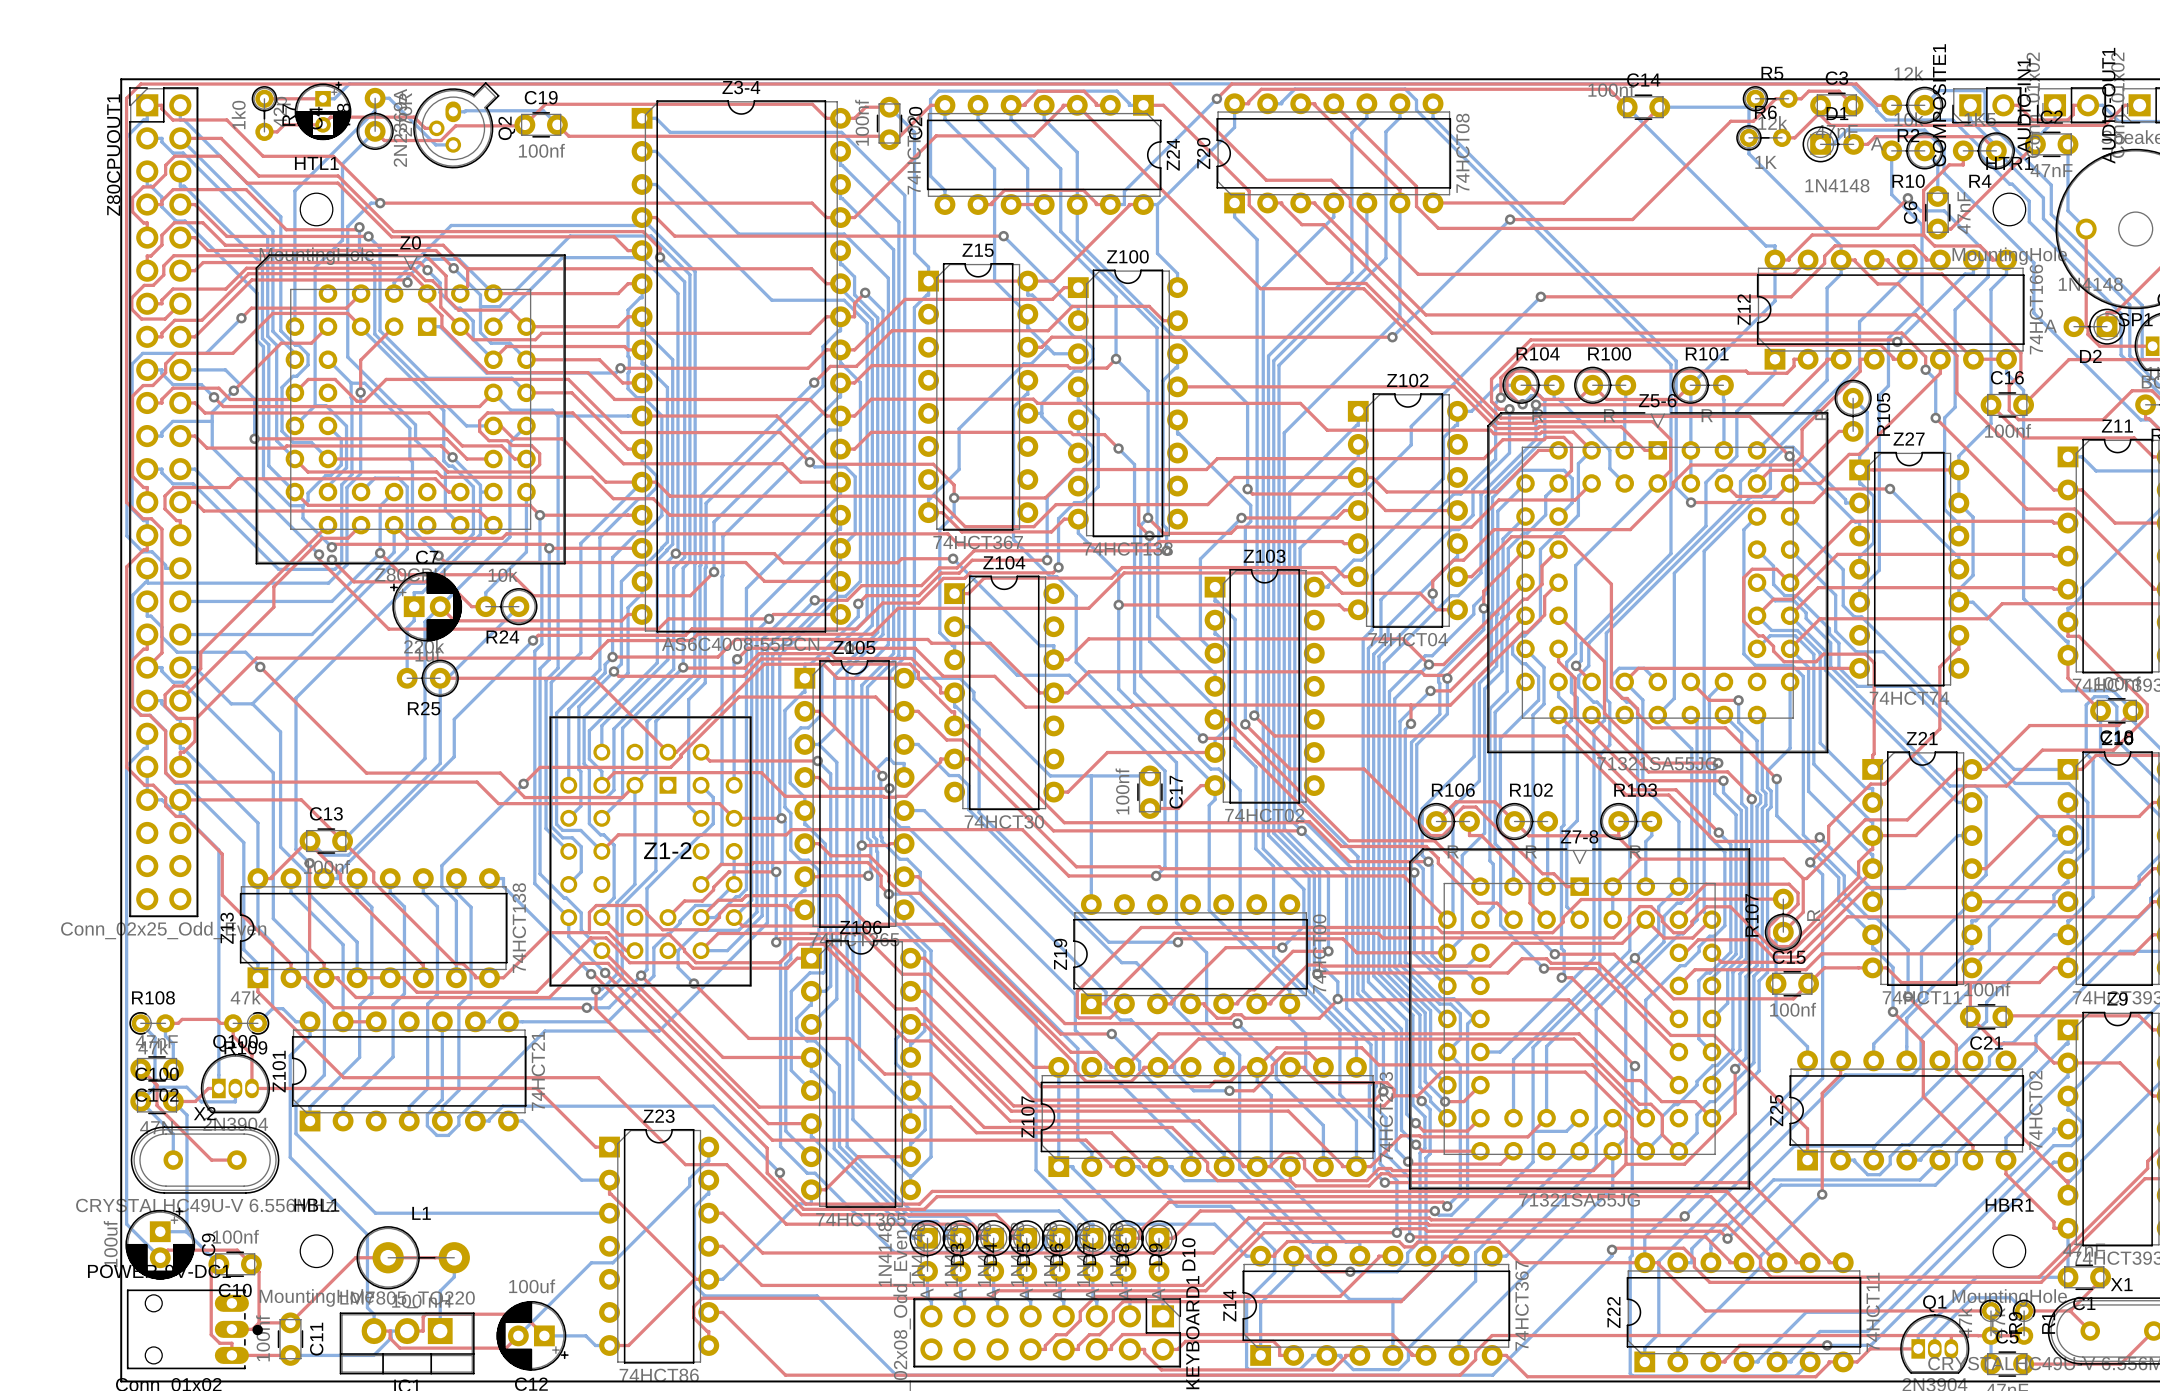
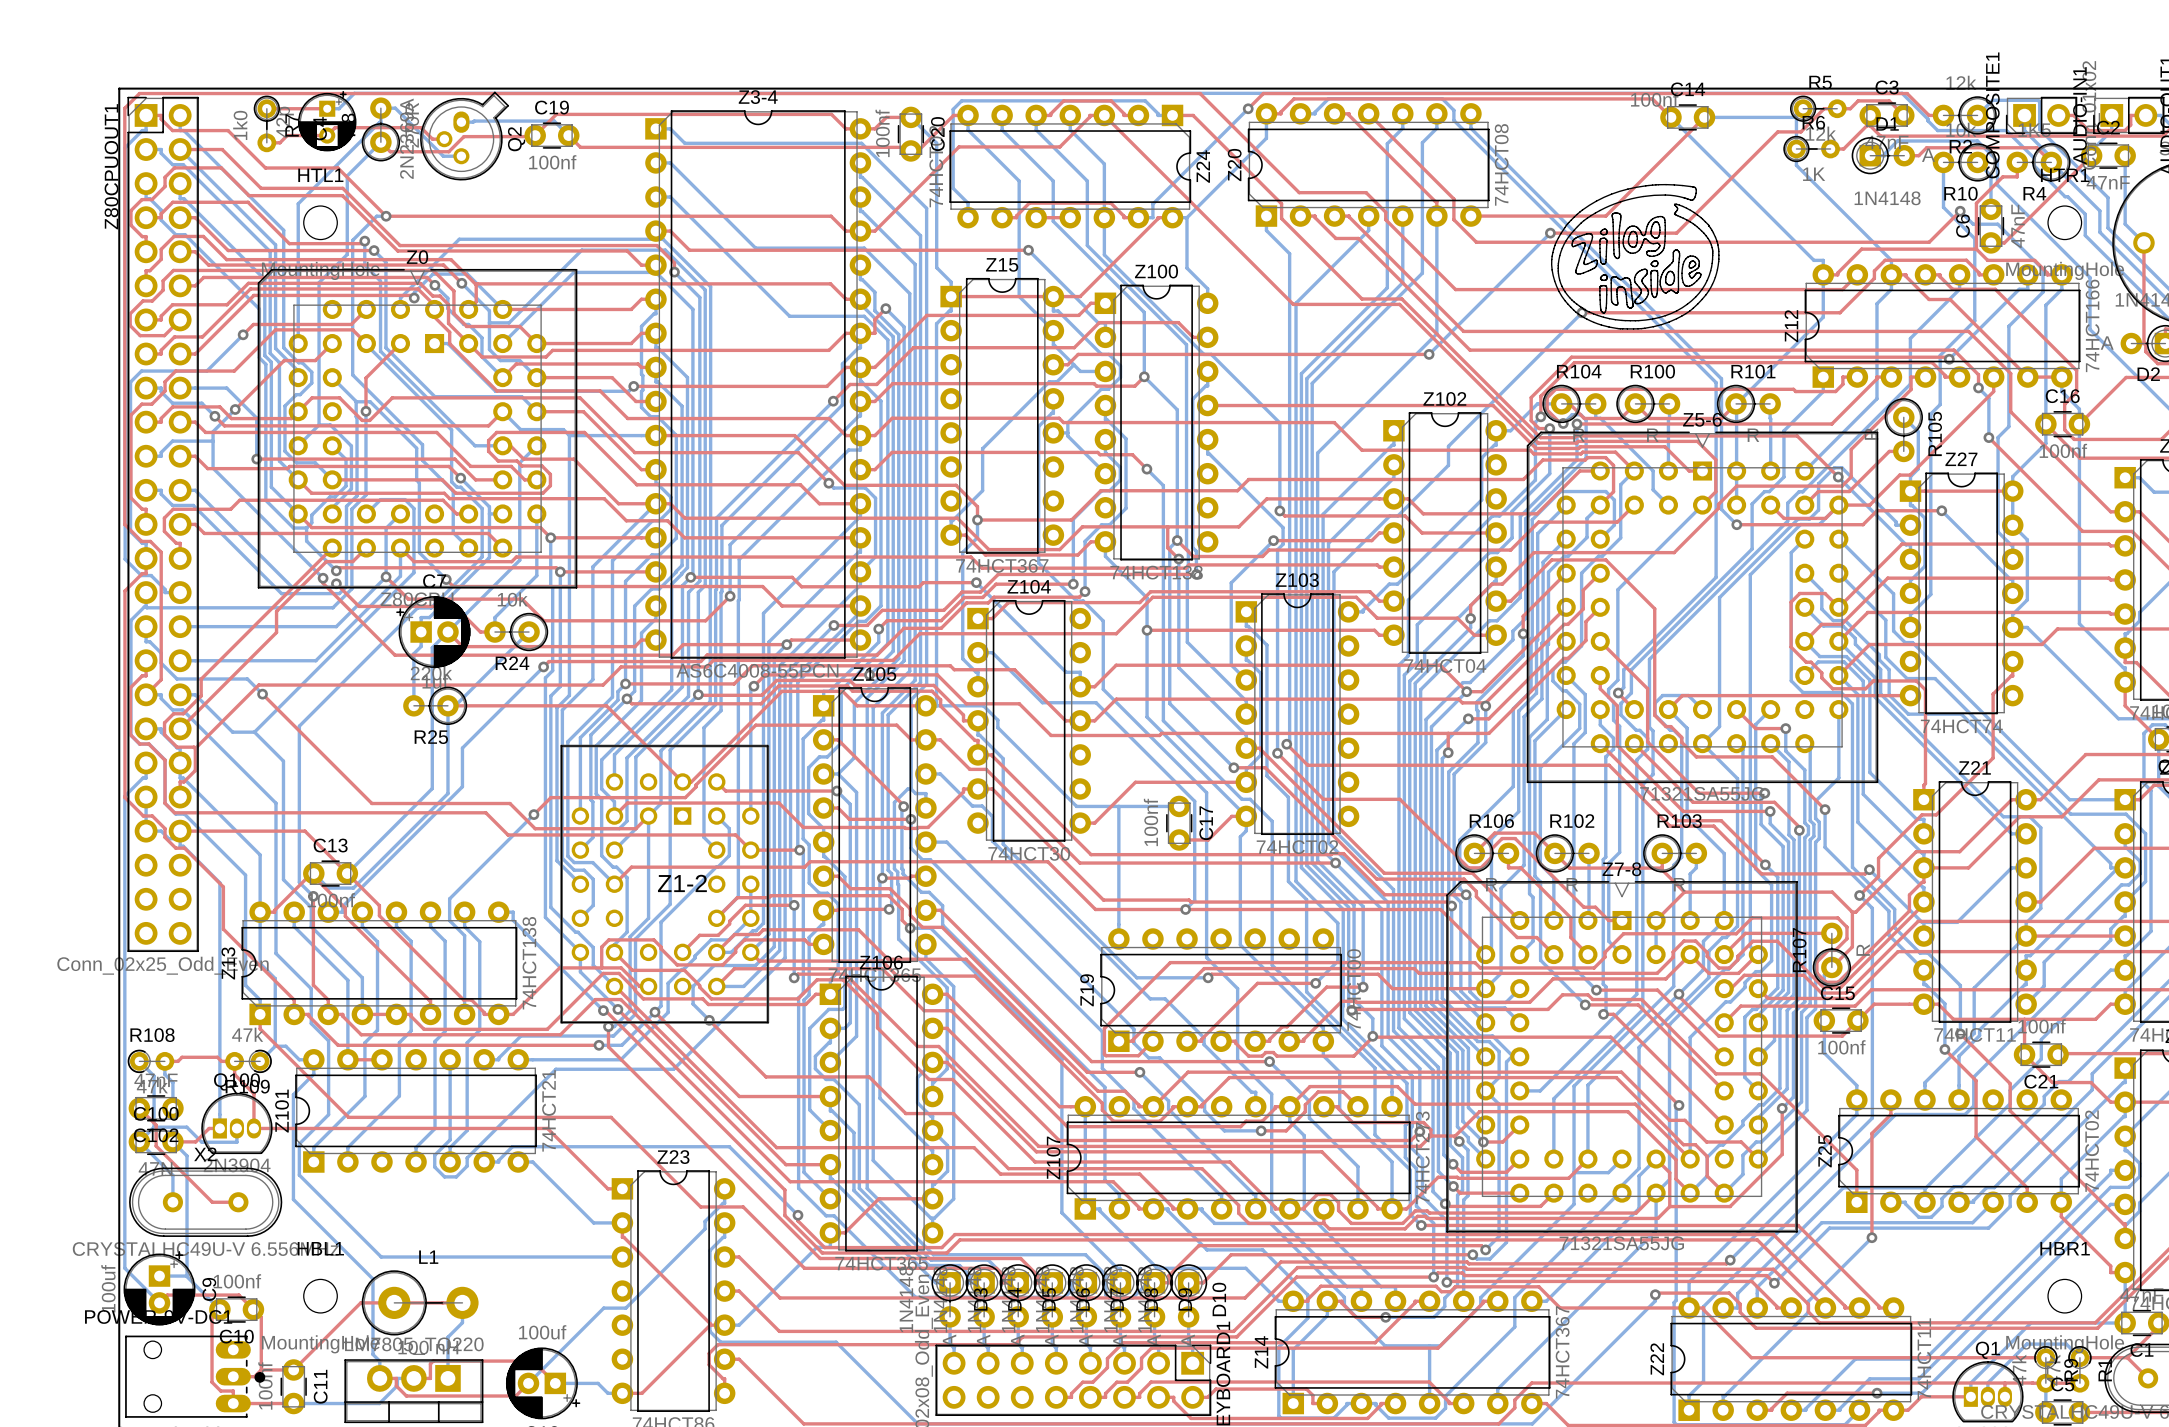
line: none -> (1658, 184) (1627, 189) (1596, 201) (1574, 217) (1558, 237) (1551, 259) (1554, 280) (1565, 300) (1574, 311) (1587, 319) (1601, 325) (1619, 328) (1641, 328) (1661, 324) (1689, 310) (1710, 287) (1718, 261) (1718, 249) (1715, 237) (1708, 224) (1700, 217) (1686, 208) (1675, 204) (1677, 208) (1674, 214) (1690, 221) (1701, 230) (1709, 241) (1712, 250) (1711, 267) (1707, 280) (1699, 293) (1687, 304) (1671, 313) (1652, 318) (1615, 319) (1584, 309) (1569, 297) (1561, 286) (1558, 268) (1562, 248) (1570, 234) (1587, 218) (1610, 205) (1637, 197) (1670, 195) (1691, 200) (1695, 195) (1694, 187) (1658, 184)
line: none -> (1614, 213) (1620, 215) (1619, 255) (1617, 258) (1614, 253) (1612, 215) (1614, 213)
line: none -> (1660, 216) (1664, 218) (1665, 225) (1664, 245) (1661, 252) (1653, 256) (1647, 254) (1647, 251) (1655, 250) (1659, 245) (1658, 243) (1651, 243) (1645, 238) (1637, 251) (1631, 253) (1626, 250) (1623, 241) (1627, 228) (1635, 226) (1644, 235) (1649, 221) (1660, 216)
line: none -> (1656, 221) (1659, 230) (1658, 236) (1655, 238) (1652, 236) (1650, 232) (1653, 224) (1656, 221)
line: none -> (1604, 229) (1606, 233) (1602, 234) (1600, 231) (1604, 229)
line: none -> (1633, 231) (1630, 233) (1628, 241) (1633, 247) (1636, 245) (1637, 239) (1636, 233) (1633, 231)
line: none -> (1589, 233) (1592, 237) (1584, 263) (1596, 260) (1597, 263) (1592, 269) (1577, 273) (1575, 270) (1585, 243) (1573, 246) (1572, 241) (1576, 237) (1589, 233)
line: none -> (1603, 238) (1599, 241) (1600, 260) (1603, 264) (1605, 261) (1606, 240) (1603, 238)
line: none -> (1676, 249) (1679, 253) (1678, 291) (1676, 292) (1670, 290) (1665, 292) (1660, 286) (1660, 279) (1663, 270) (1672, 261) (1673, 252) (1675, 250)
line: none -> (1690, 256) (1684, 260) (1682, 270) (1683, 282) (1687, 286) (1694, 283) (1700, 275) (1697, 272) (1692, 277) (1689, 276) (1689, 273) (1697, 268) (1699, 263) (1696, 258) (1690, 256)
line: none -> (1655, 260) (1651, 263) (1653, 266) (1657, 265) (1655, 260)
line: none -> (1692, 261) (1689, 263) (1689, 267) (1695, 264) (1692, 261)
line: none -> (1644, 269) (1646, 270) (1647, 273) (1642, 281) (1648, 294) (1643, 301) (1636, 303) (1635, 300) (1641, 291) (1635, 282) (1634, 277) (1637, 272) (1644, 269)
line: none -> (1653, 270) (1656, 270) (1657, 273) (1657, 293) (1654, 297) (1651, 288) (1650, 272) (1653, 270)
line: none -> (1670, 271) (1673, 274) (1674, 279) (1669, 285) (1666, 282) (1665, 279) (1666, 274) (1670, 271)
line: none -> (1604, 274) (1606, 278) (1602, 280) (1600, 277) (1604, 274)
line: none -> (1614, 276) (1611, 279) (1612, 302) (1617, 304) (1617, 289) (1622, 286) (1625, 290) (1627, 306) (1632, 307) (1629, 279) (1625, 277) (1620, 279) (1614, 276)
line: none -> (1603, 285) (1606, 286) (1606, 290) (1606, 307) (1603, 313) (1600, 309) (1599, 290) (1600, 286) (1603, 285)

